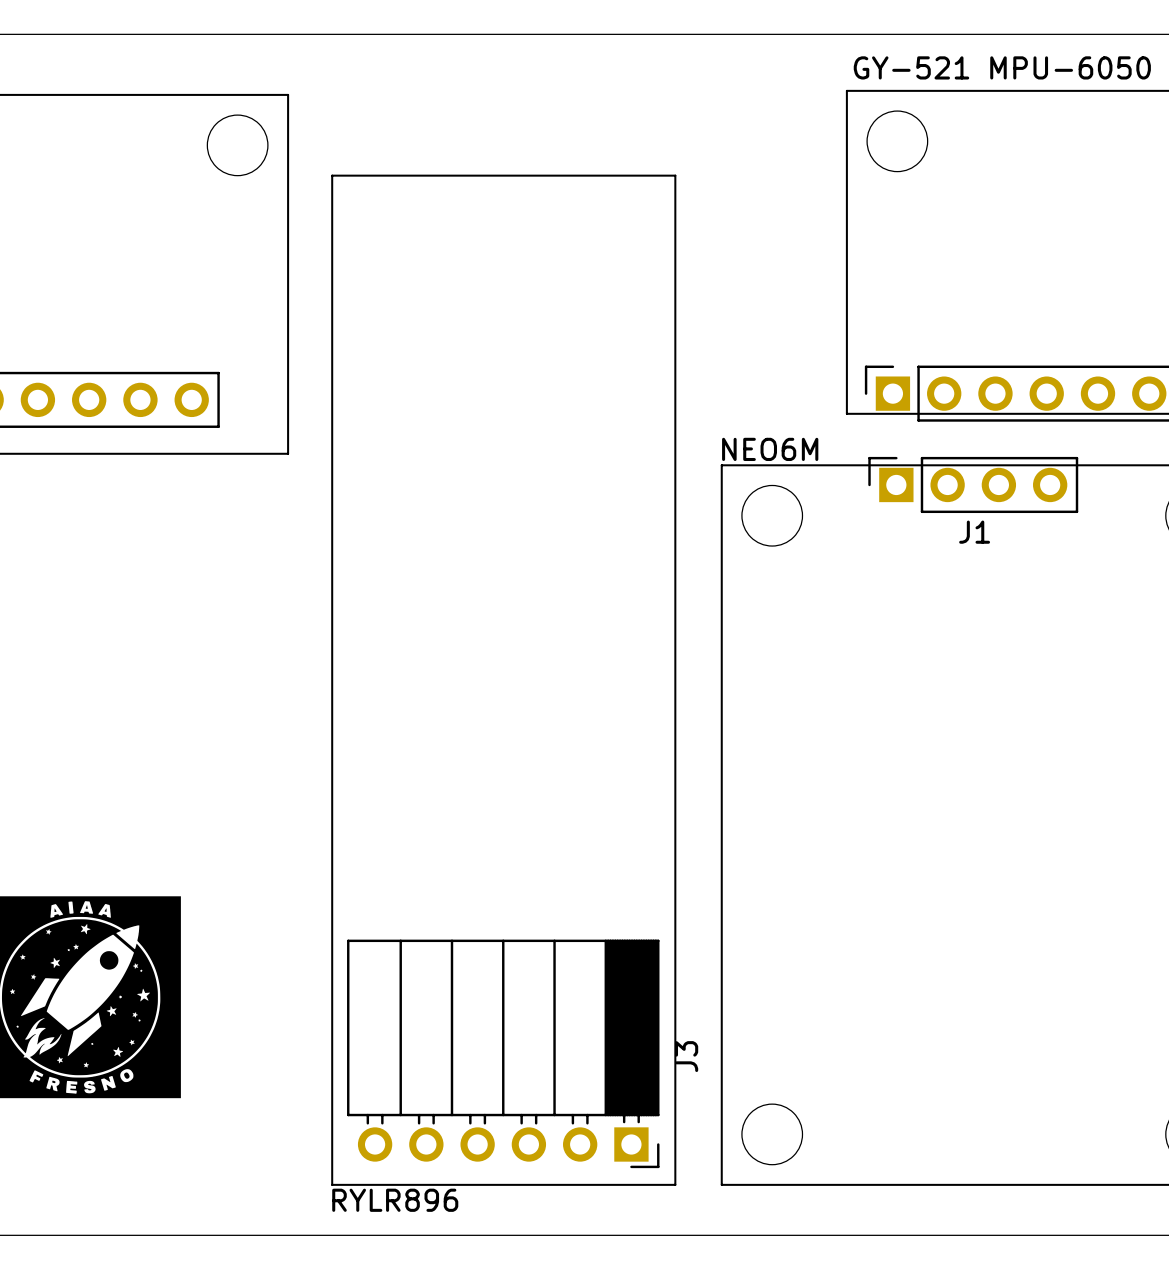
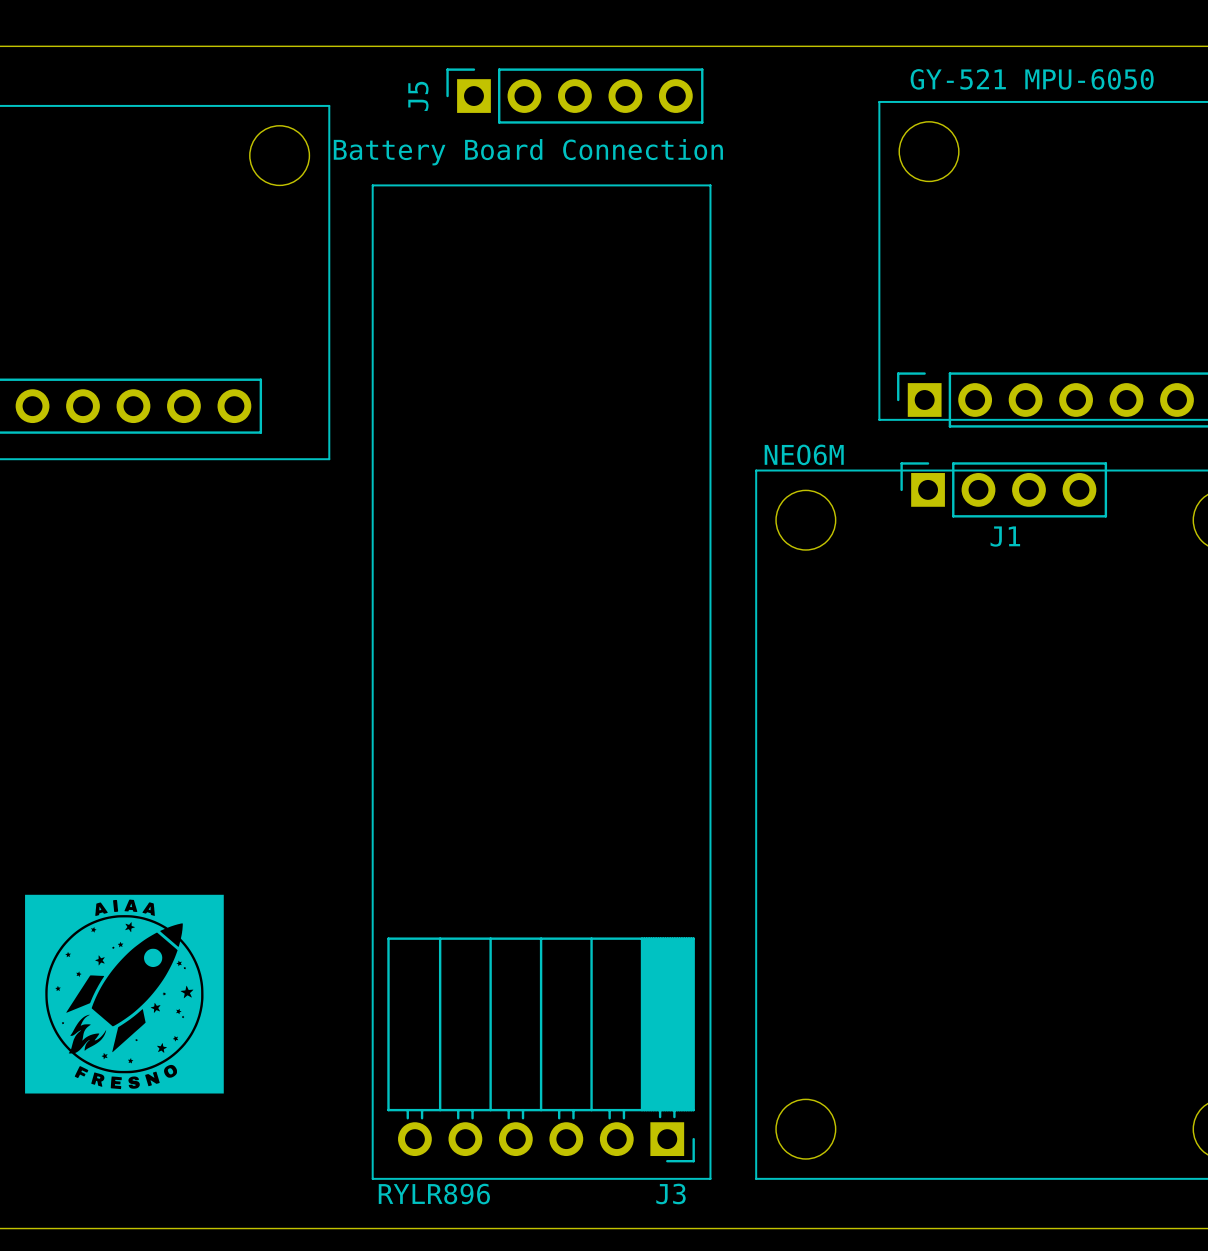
J5: none -> (574, 96)
J3 name rotation: 0° (686, 1056) -> 90° clockwise (671, 1193)
J3 name position: J3 (686, 1056) -> J3 (671, 1193)

